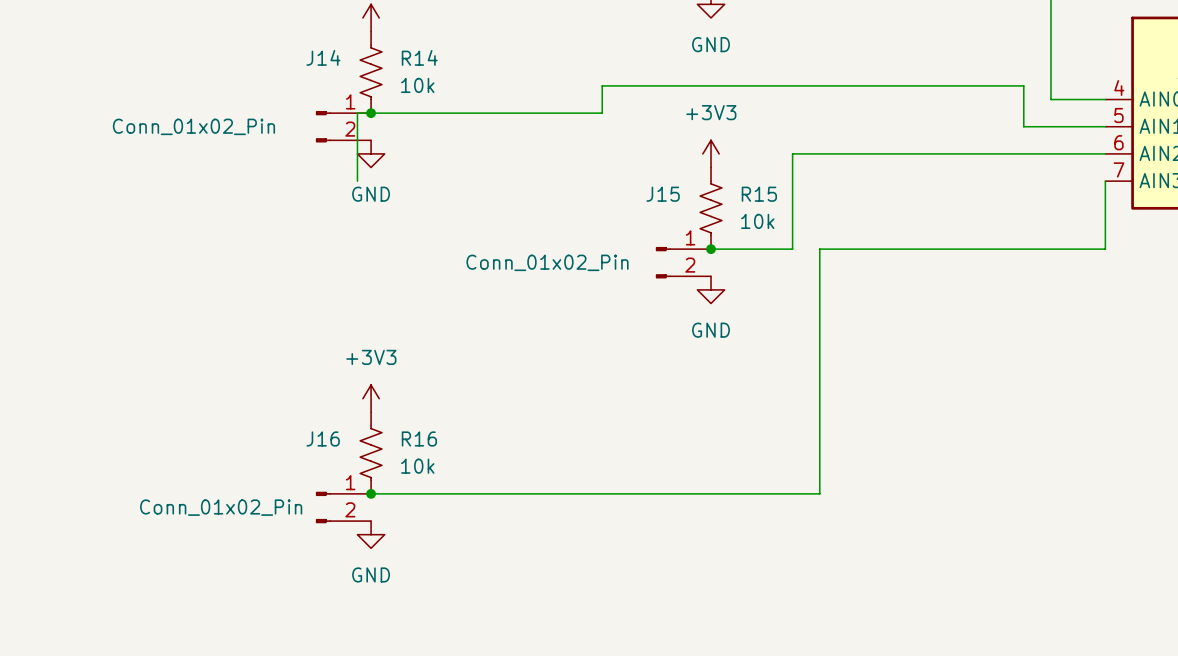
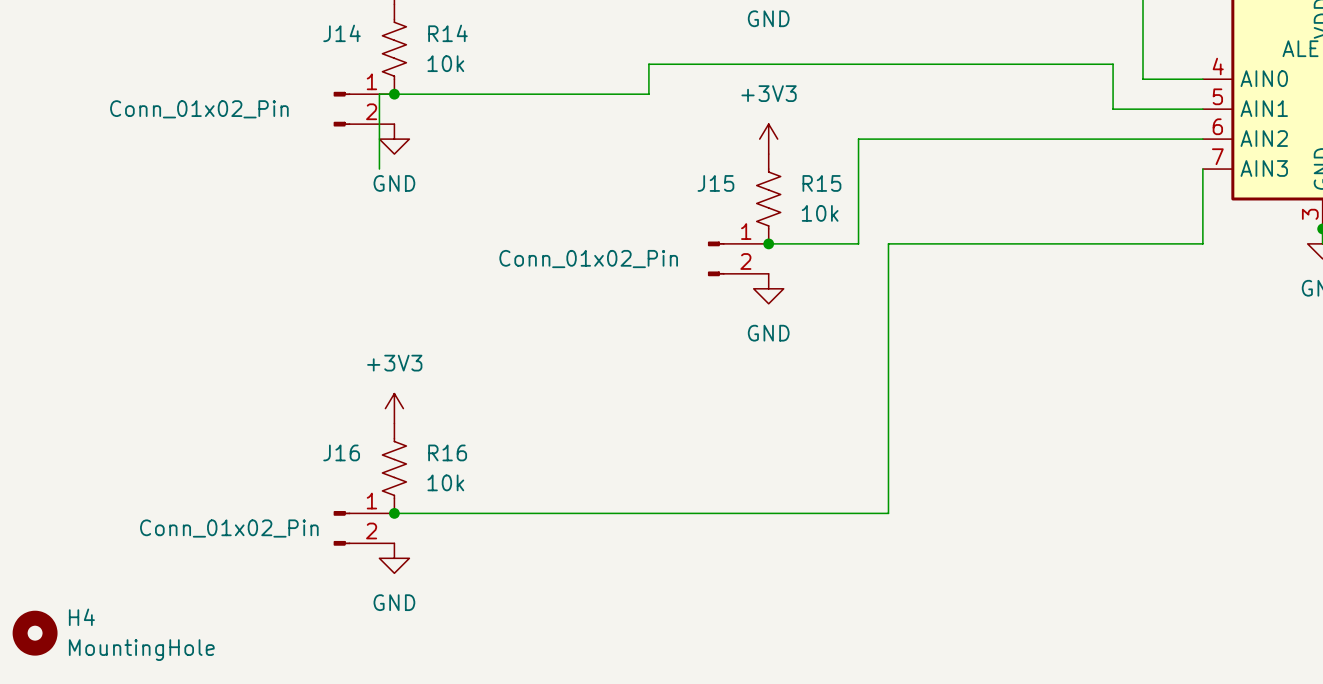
H4: none -> MountingHole (35, 633)

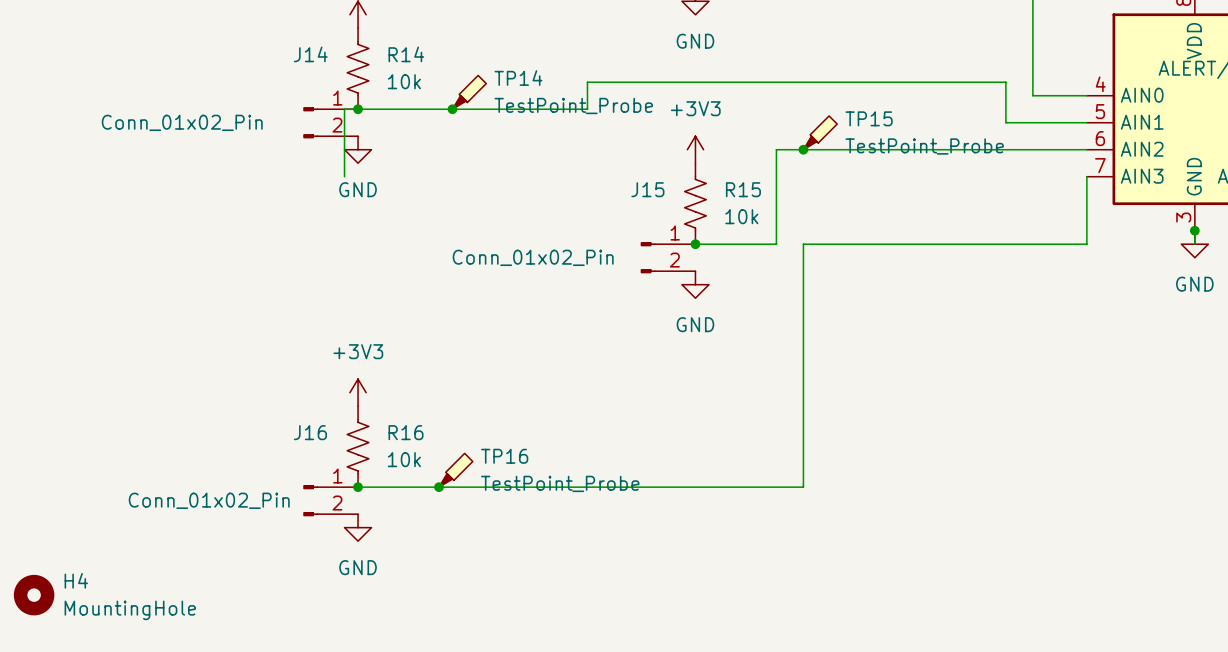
TP14: none -> TestPoint_Probe (469, 92)
junction: none -> (452, 109)
TP15: none -> TestPoint_Probe (820, 132)
junction: none -> (803, 149)
TP16: none -> TestPoint_Probe (455, 470)
junction: none -> (439, 487)

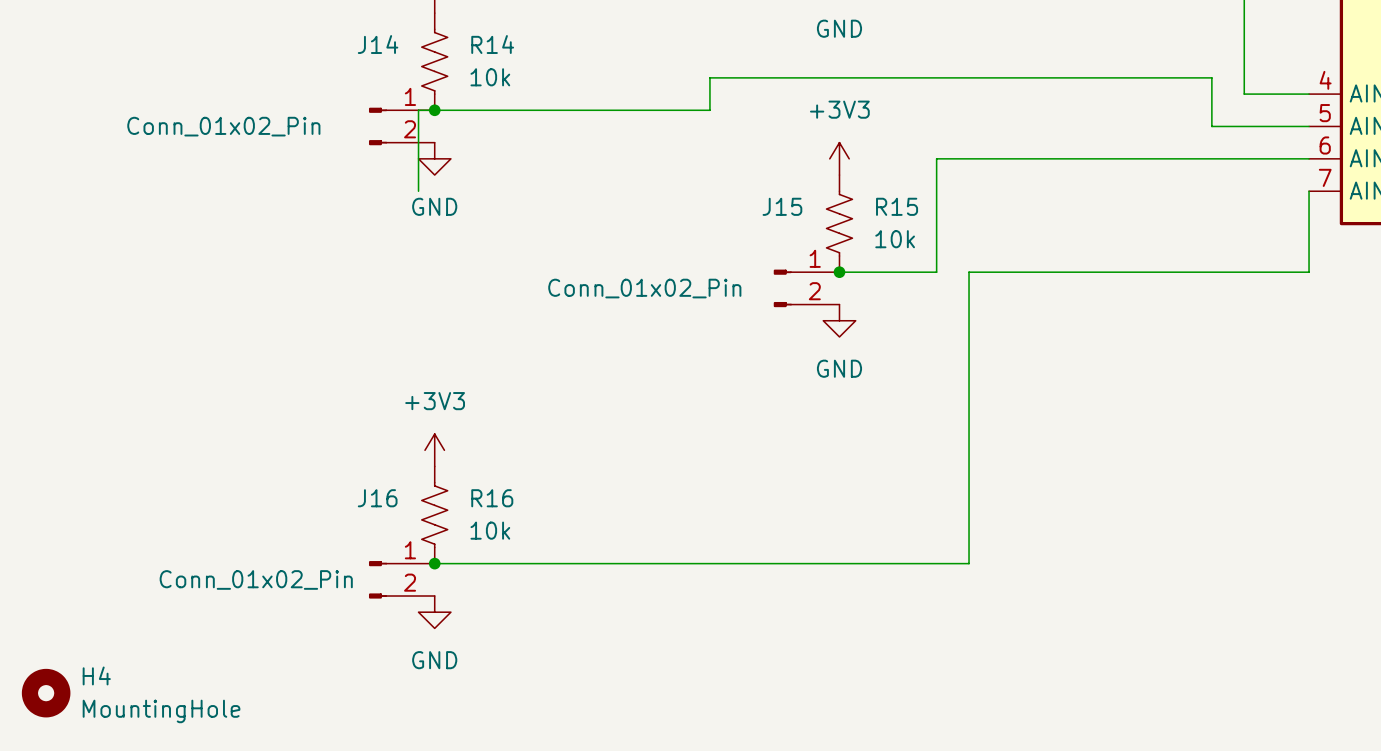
TP14: TestPoint_Probe (469, 92) -> none
junction: (452, 109) -> none
TP15: TestPoint_Probe (820, 132) -> none
junction: (803, 149) -> none
TP16: TestPoint_Probe (455, 470) -> none
junction: (439, 487) -> none

